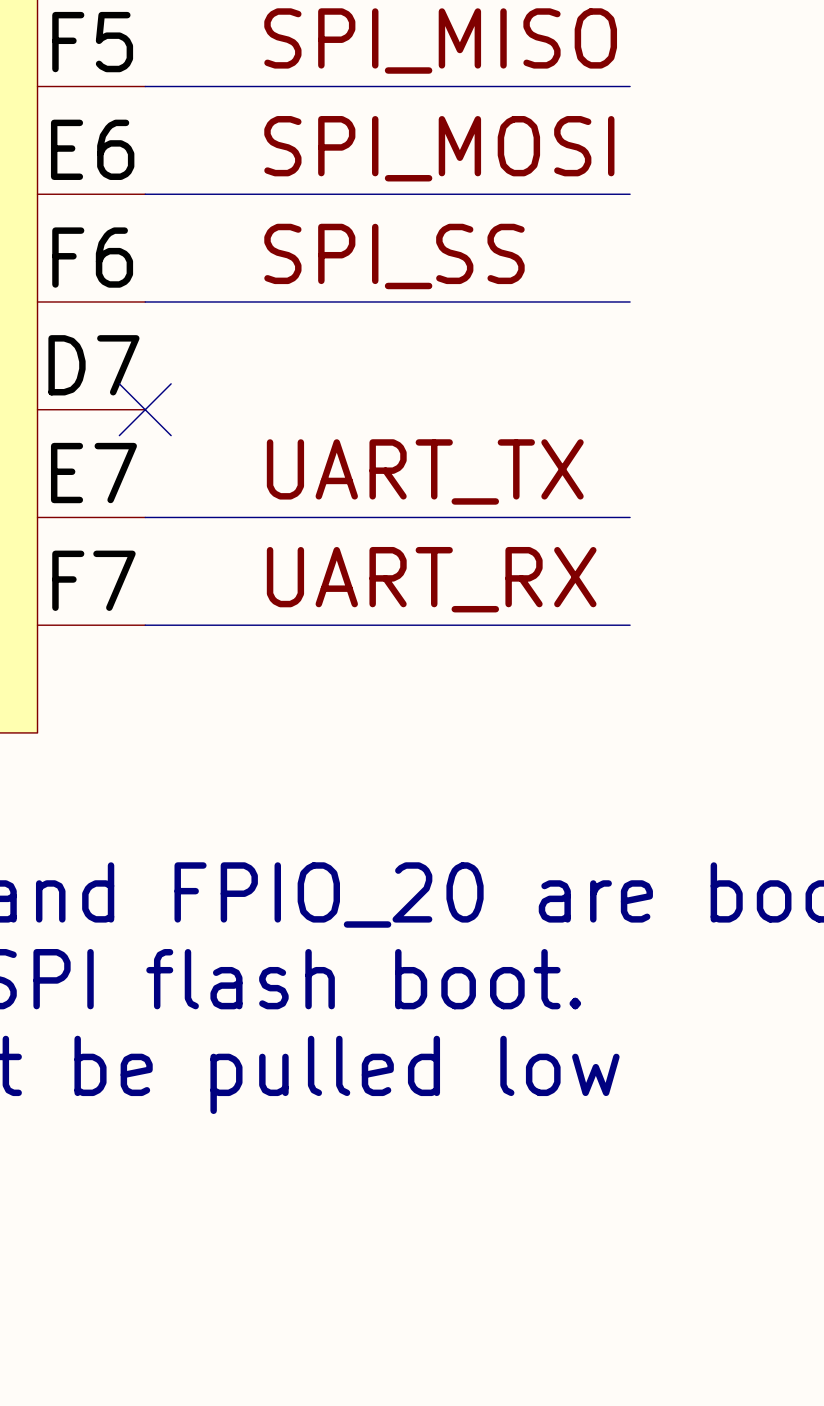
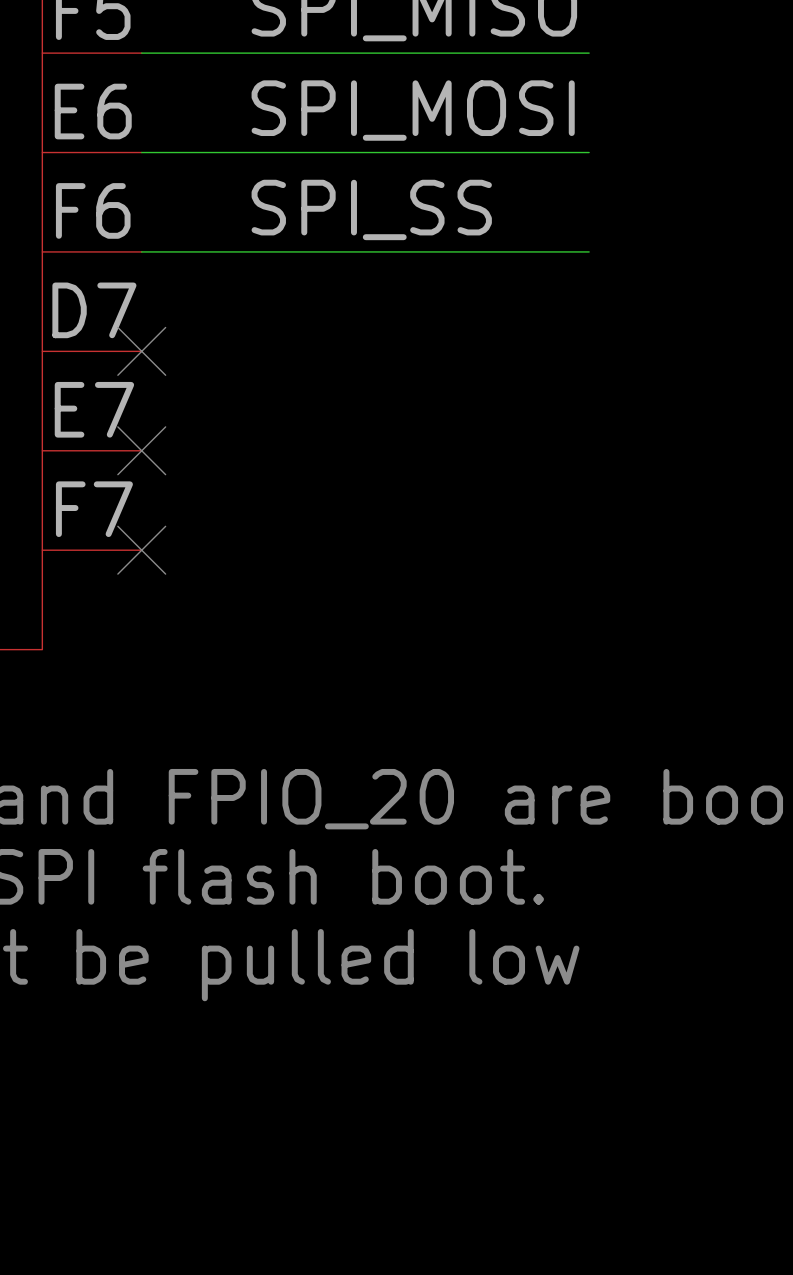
label: UART_TX (425, 471) -> none
wire: (145, 517) (630, 517) -> none
no-connect mark: none -> (141, 450)
label: UART_RX (431, 579) -> none
wire: (145, 625) (630, 625) -> none
no-connect mark: none -> (141, 550)

